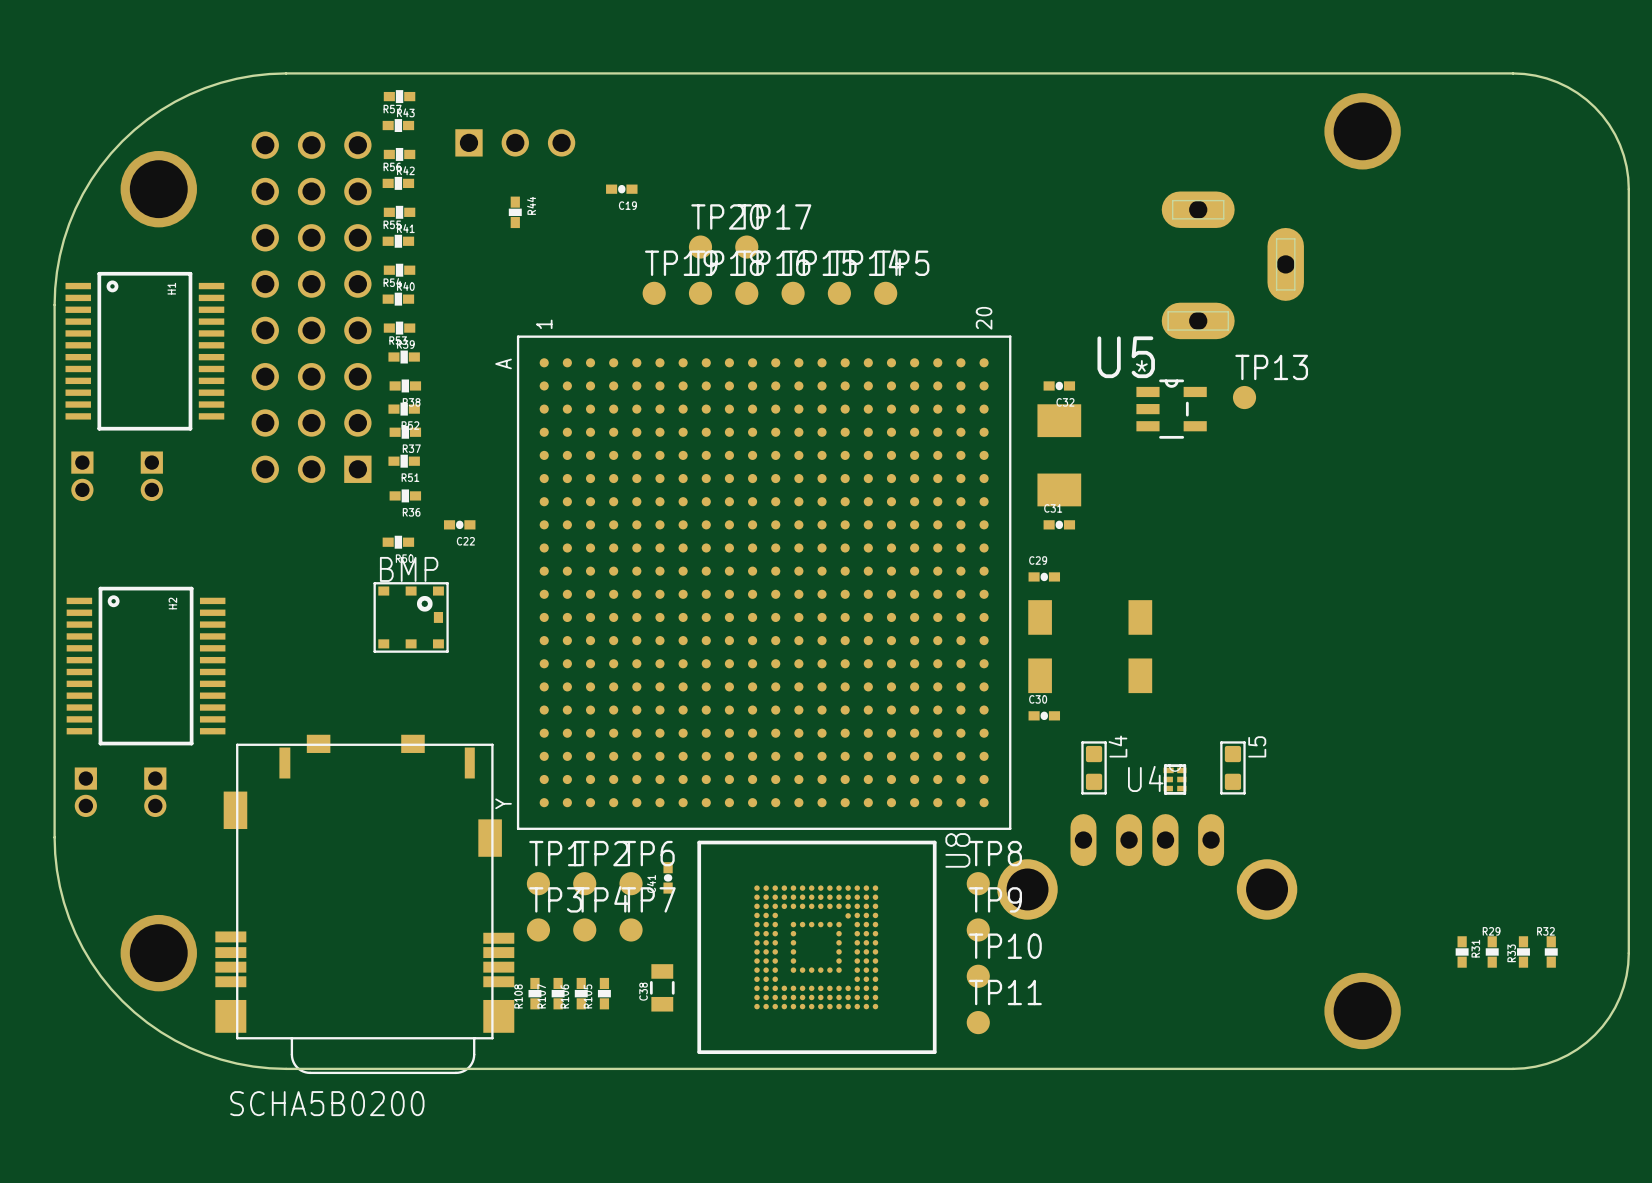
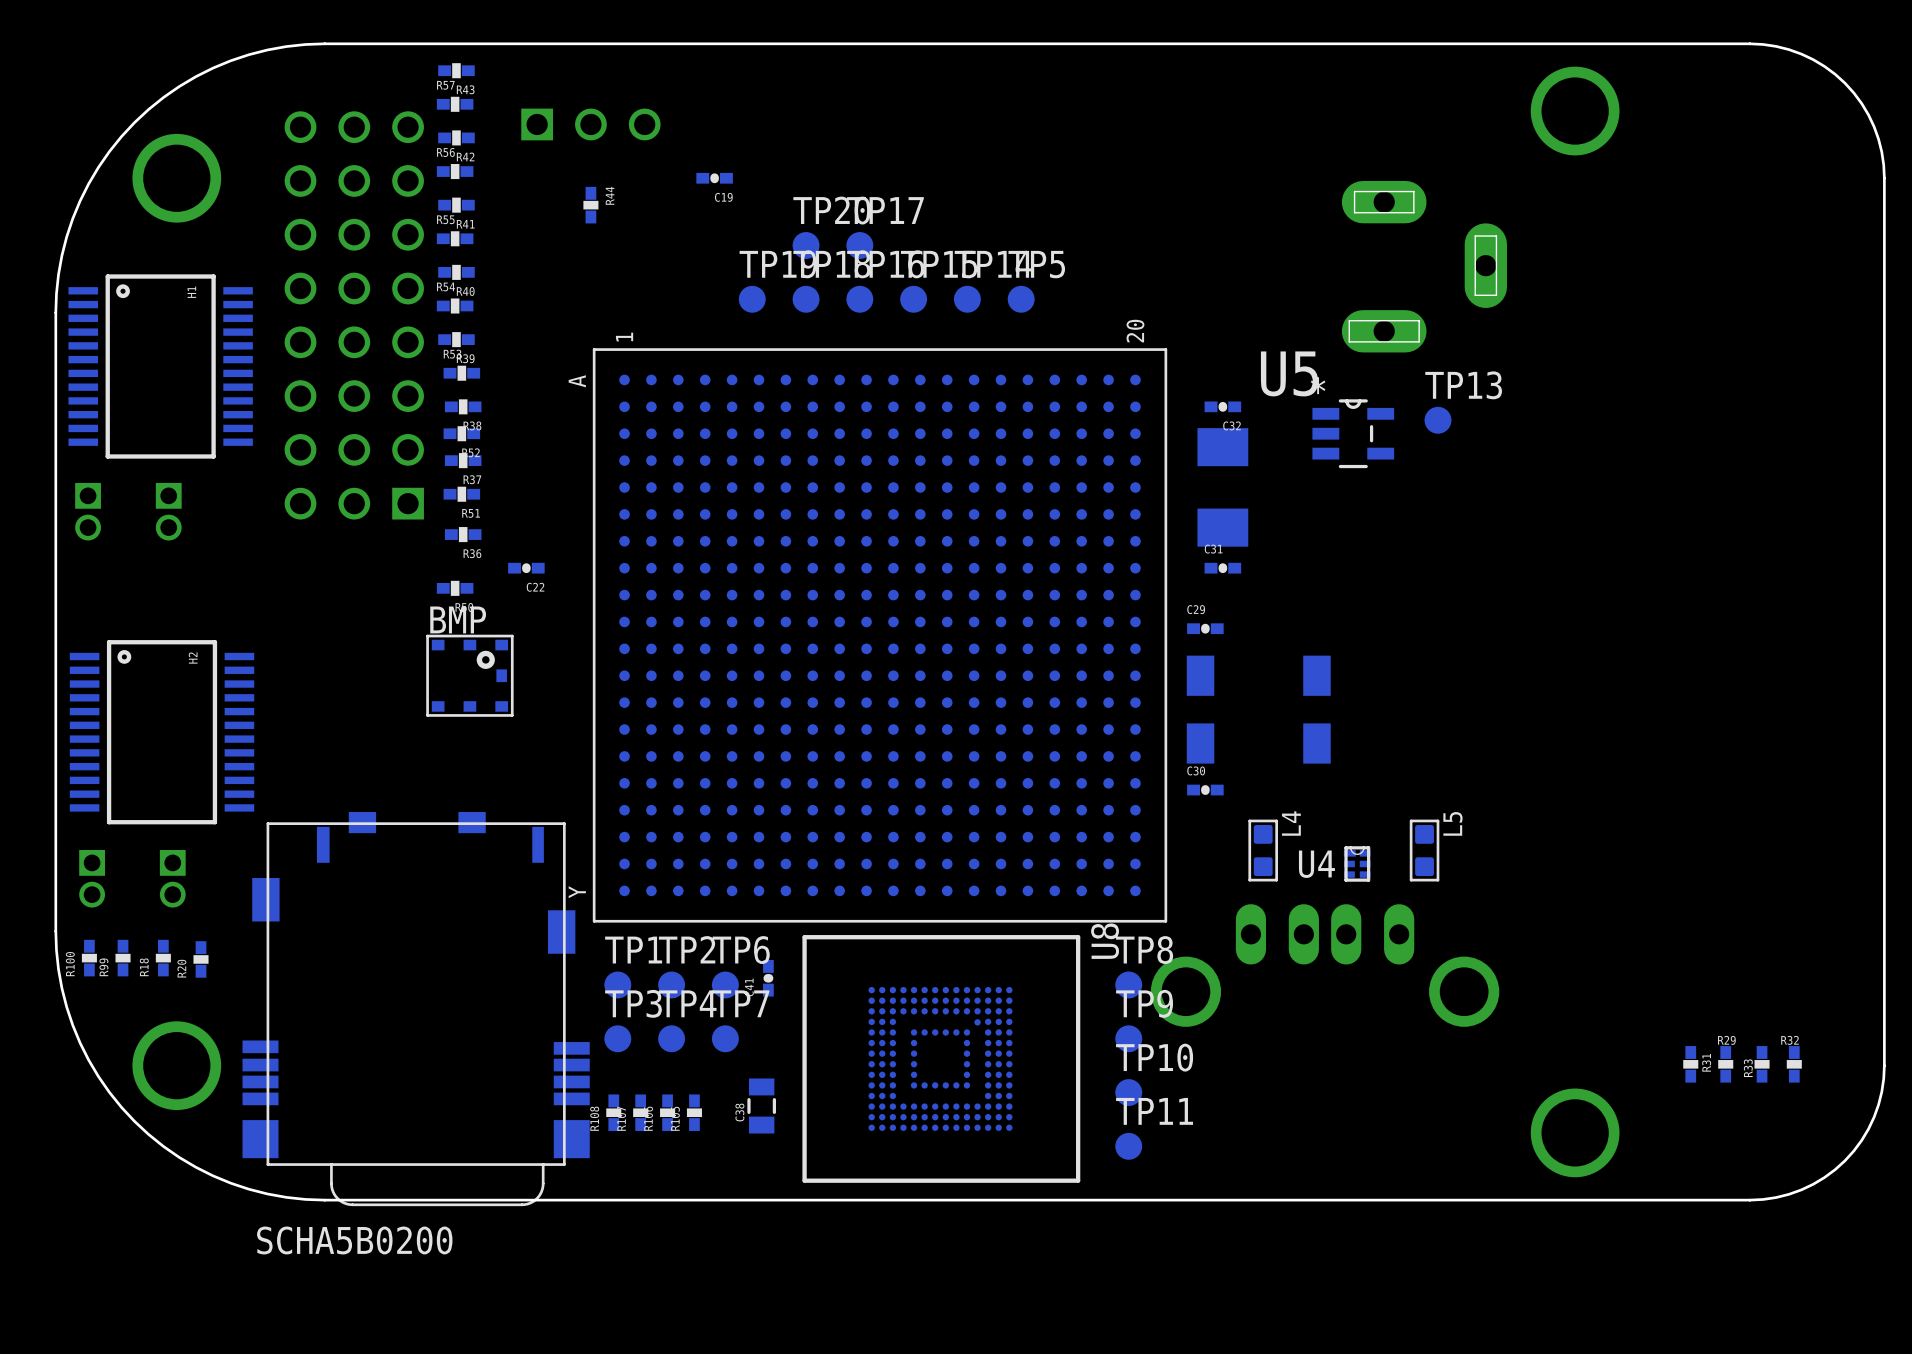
R100: none -> (89, 958)
R99: none -> (123, 958)
R18: none -> (163, 958)
R20: none -> (201, 959)

